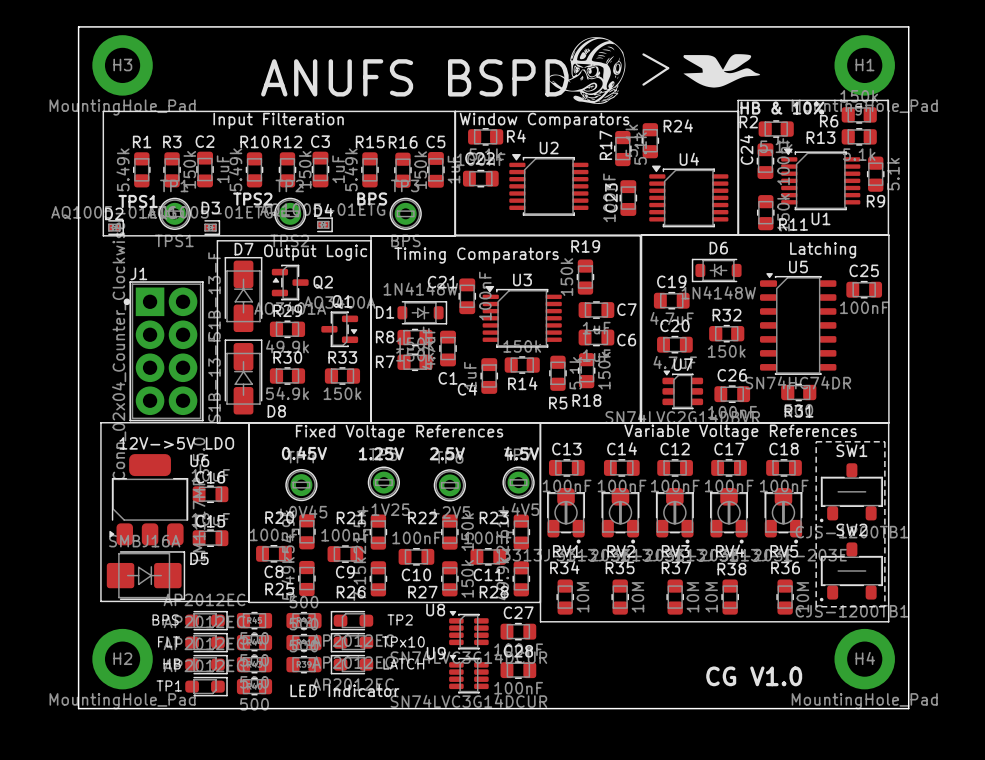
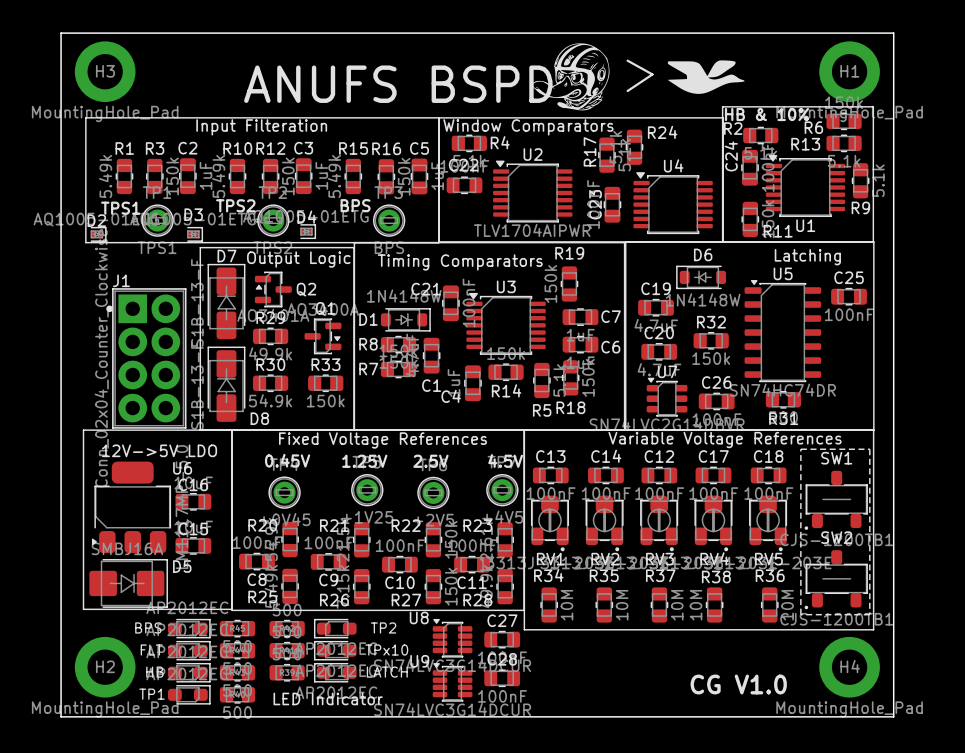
U2 value: none -> TLV1704AIPWR (532, 230)

